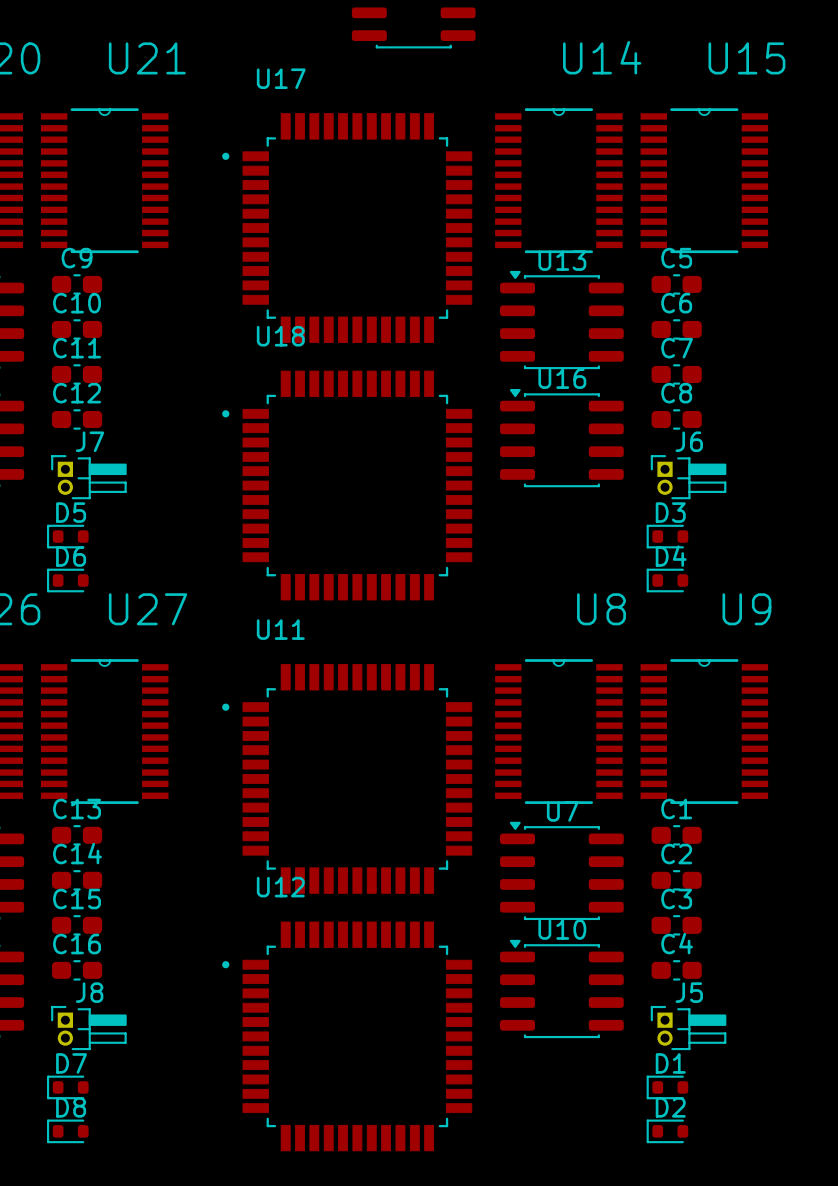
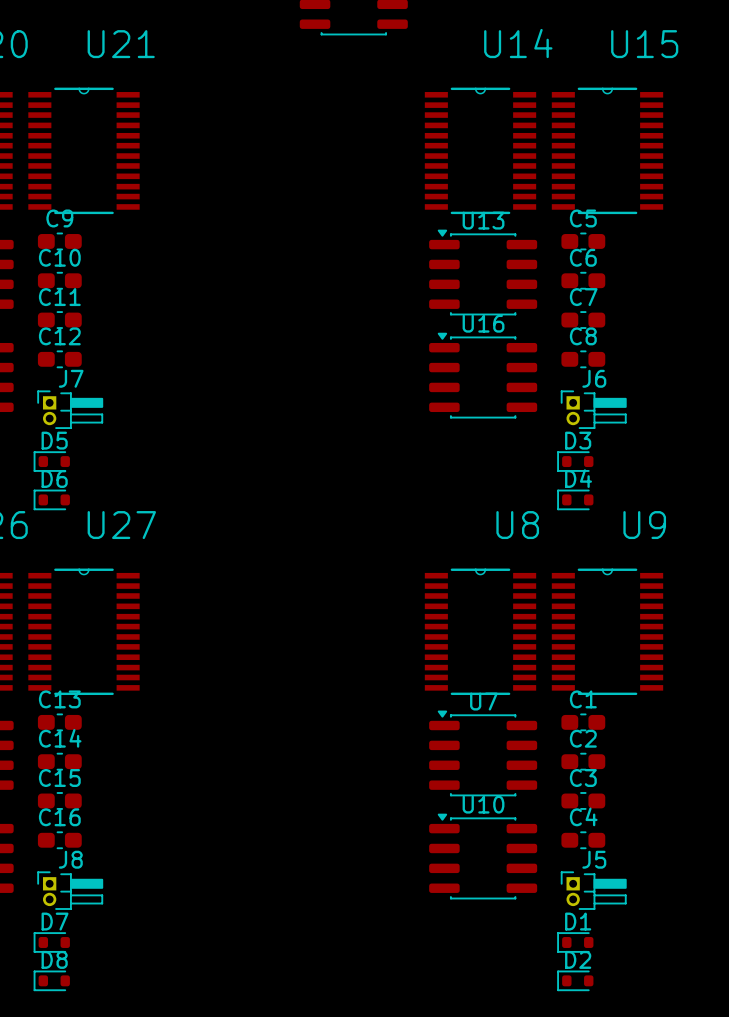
U17: (347, 228) -> none
U18: (347, 485) -> none
U11: (347, 778) -> none
U12: (347, 1036) -> none

